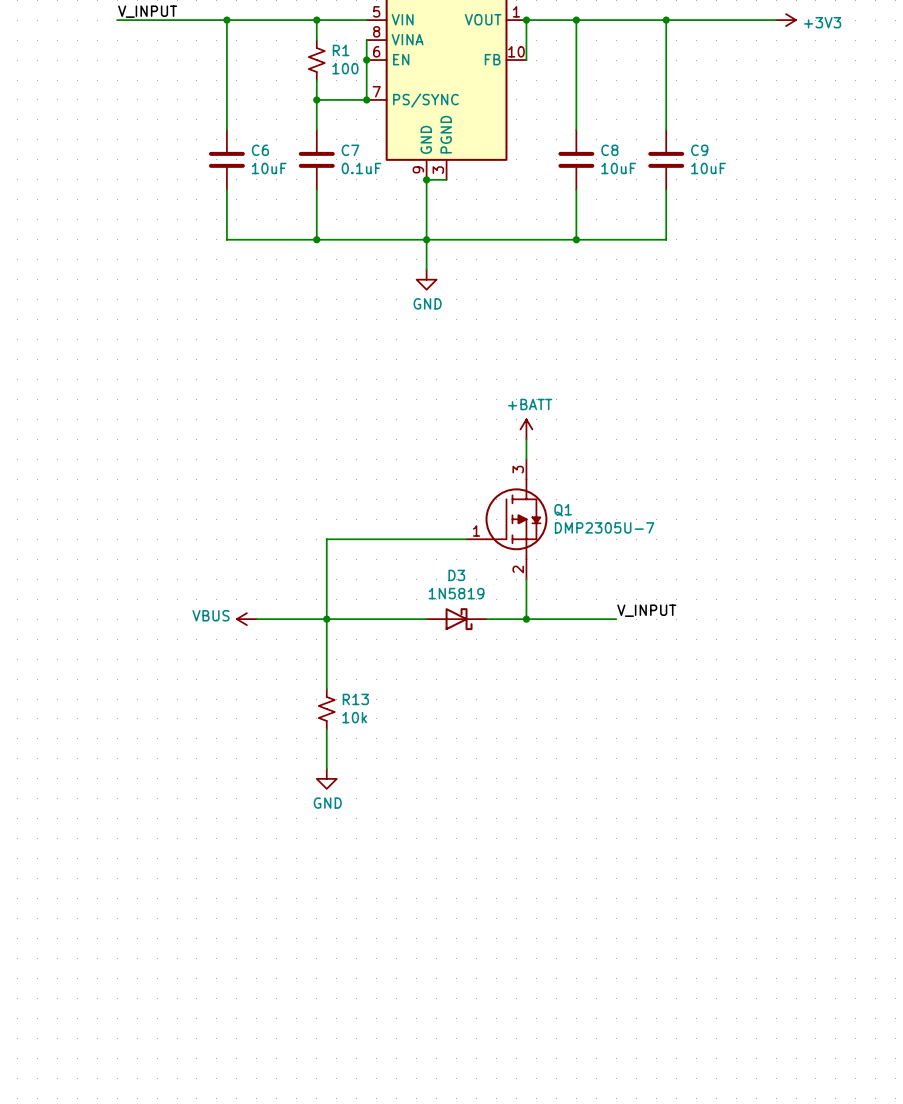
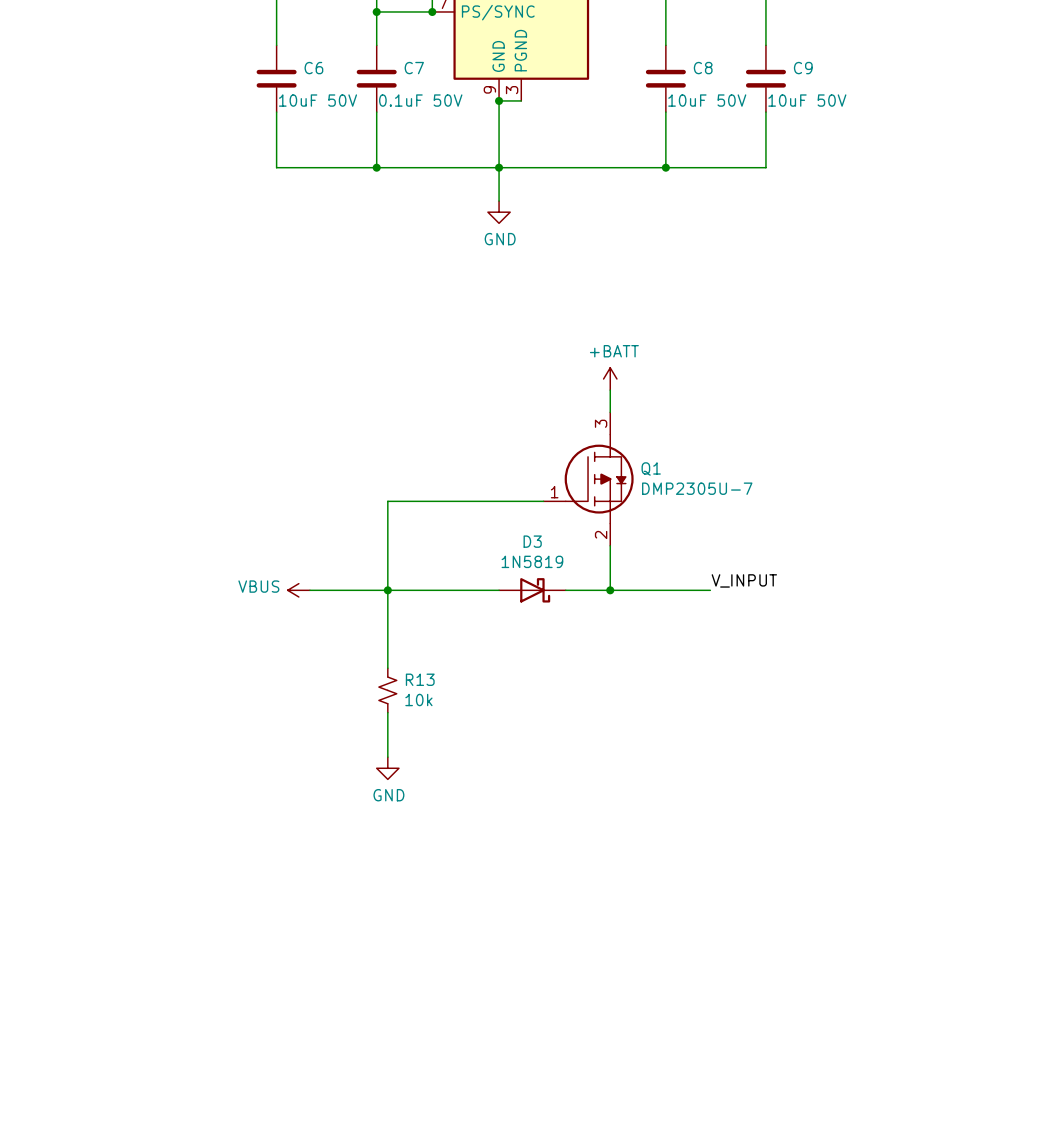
C6 value: 10uF (269, 168) -> 10uF 50V (318, 100)
C7 value: 0.1uF (361, 168) -> 0.1uF 50V (420, 100)
C8 value: 10uF (618, 168) -> 10uF 50V (707, 100)
C9 value: 10uF (708, 168) -> 10uF 50V (807, 100)

